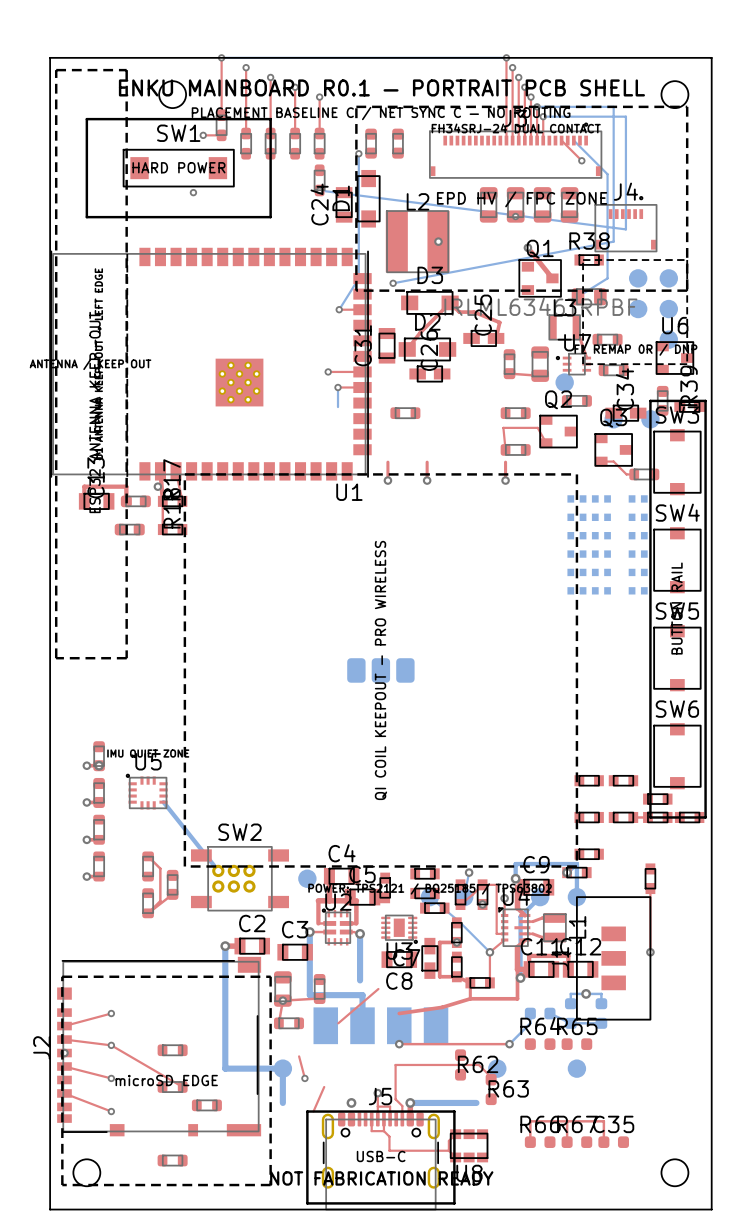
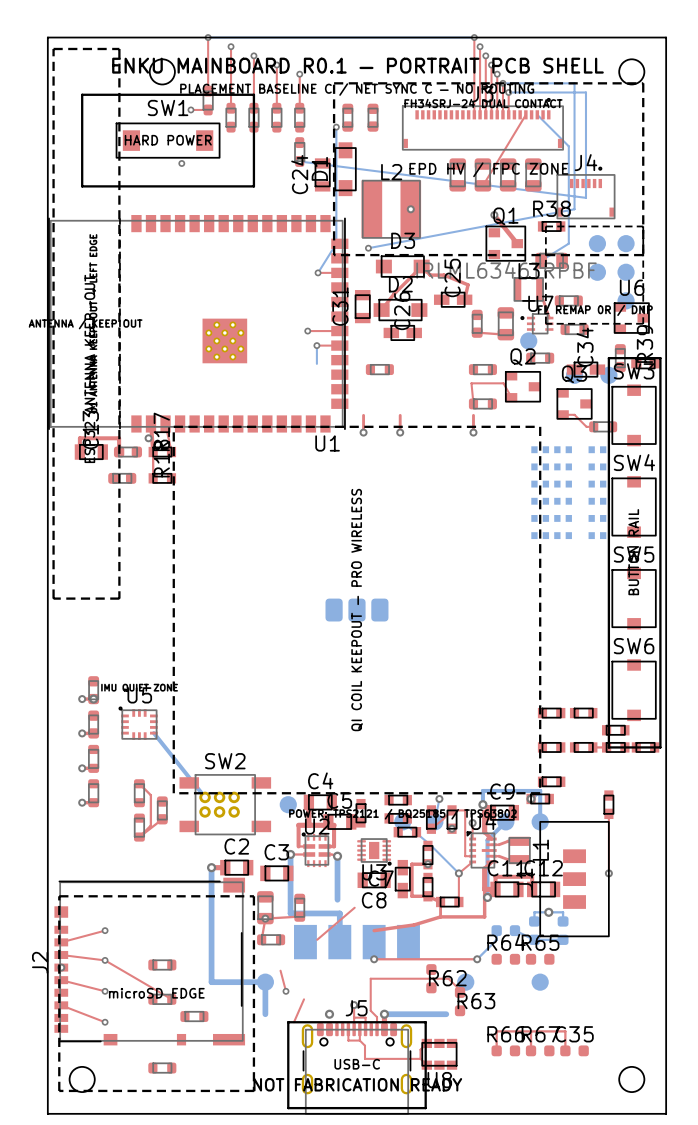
top track: (561, 140) (581, 160) -> (525, 114) (482, 185)
via: (581, 160) -> none
via: (515, 216) -> none

